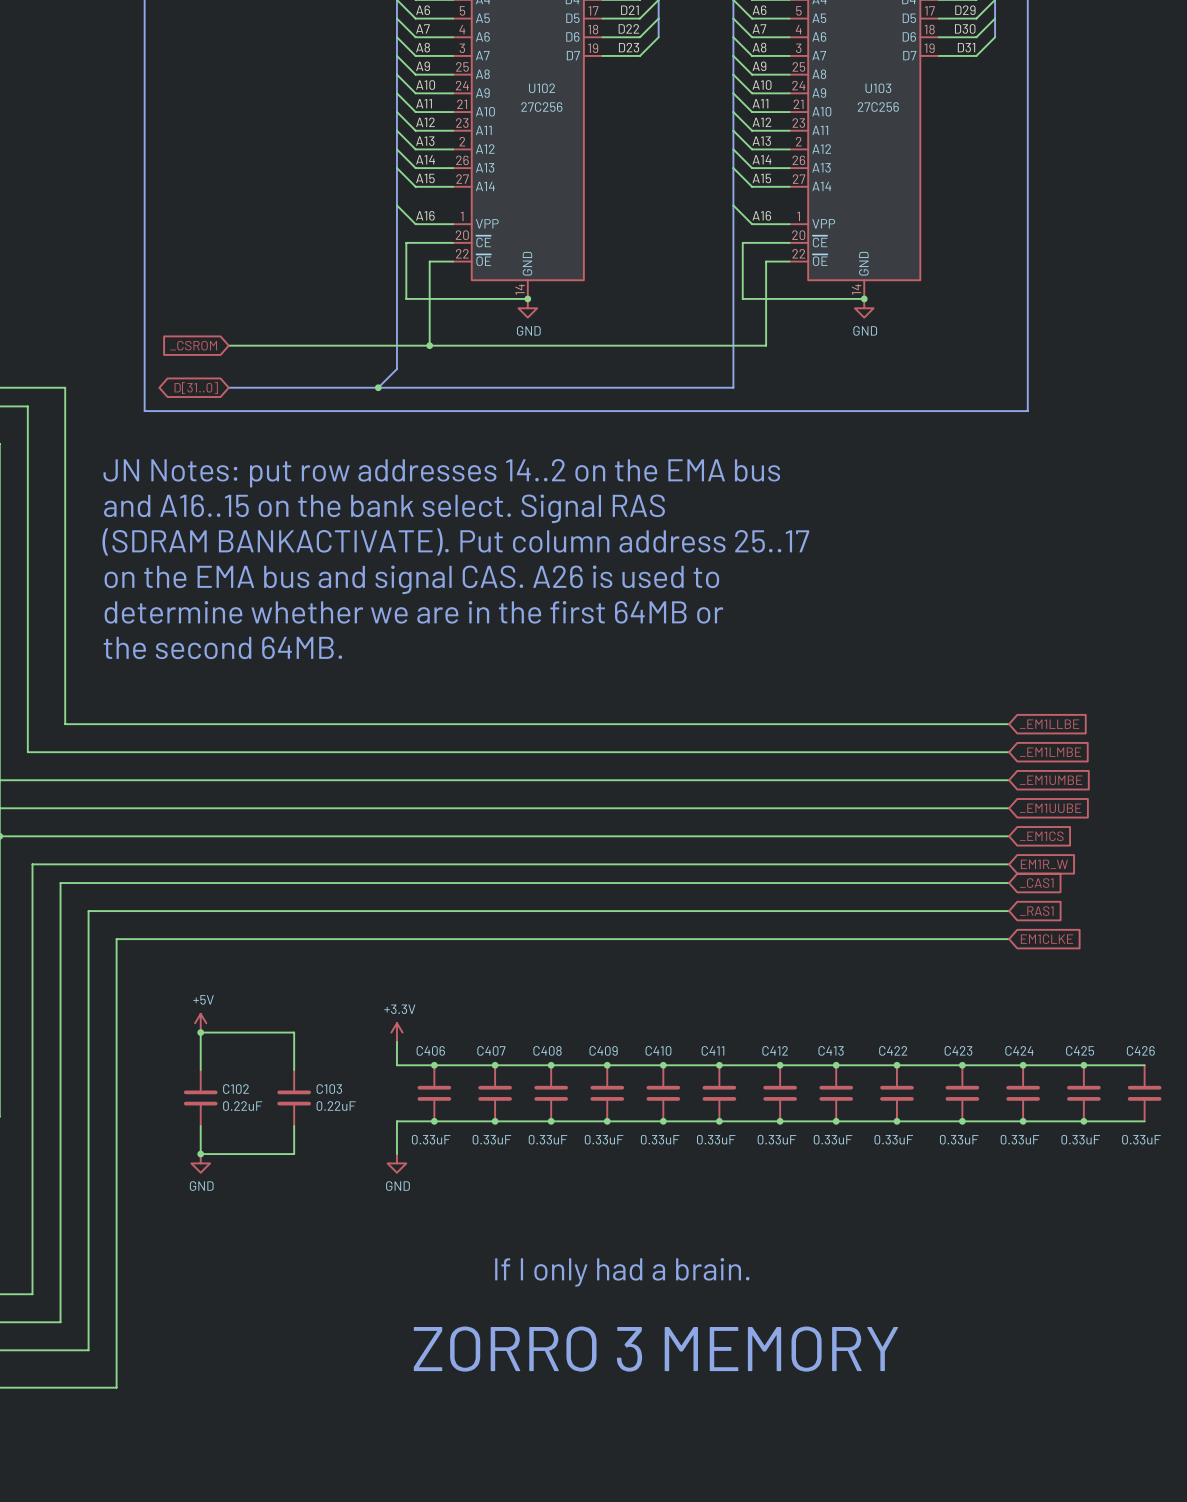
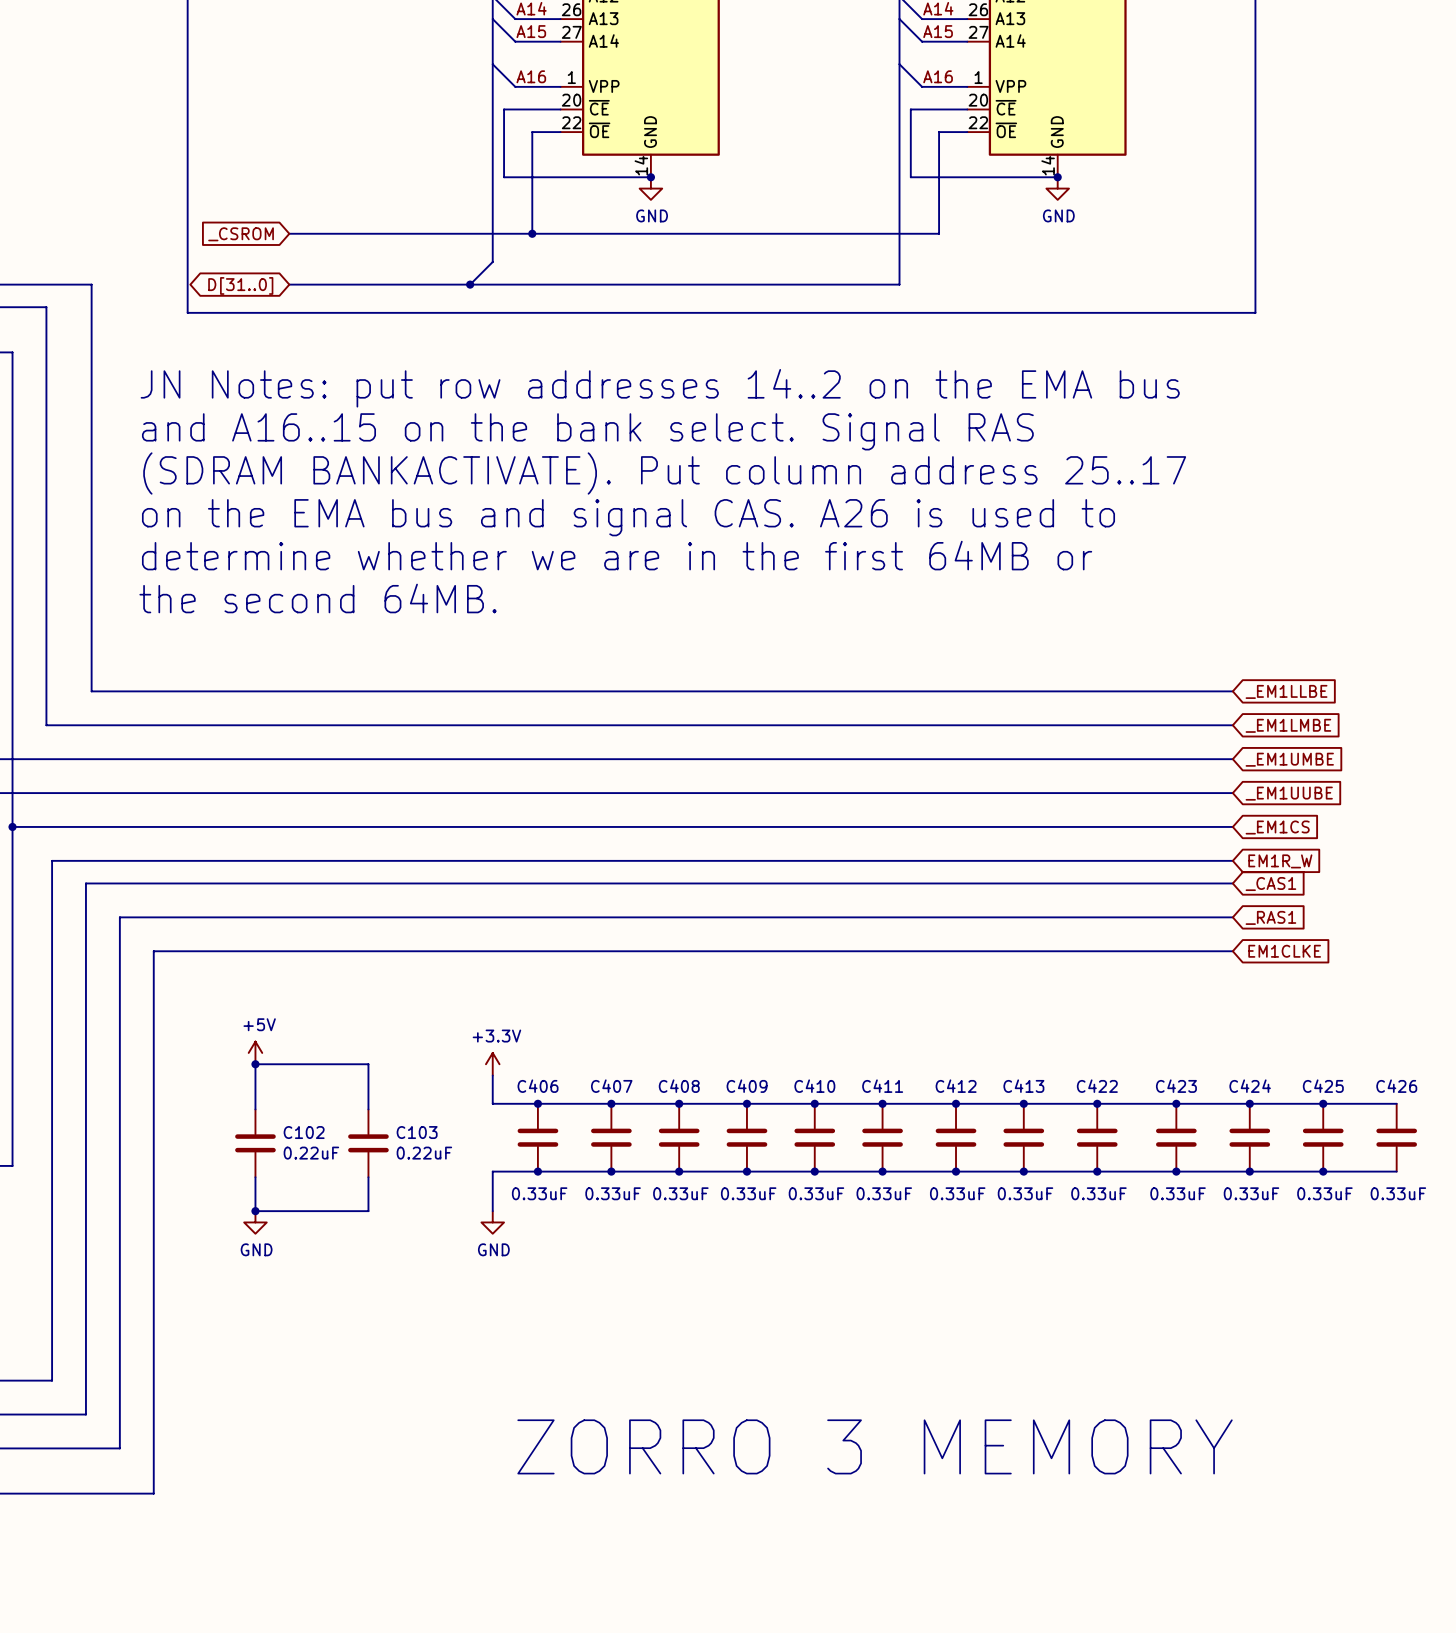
text: If I only had a brain. (622, 1272) -> none

